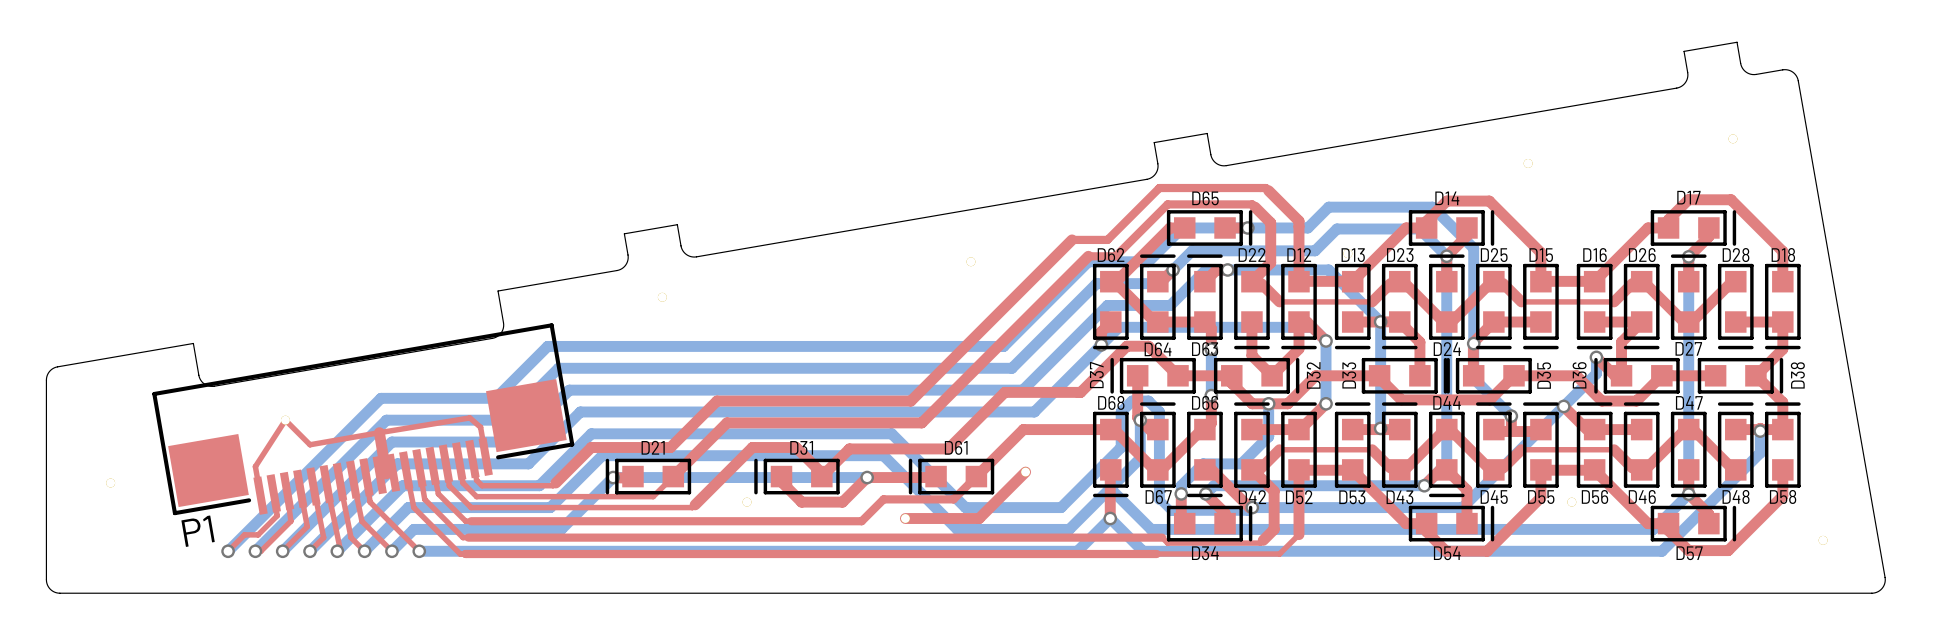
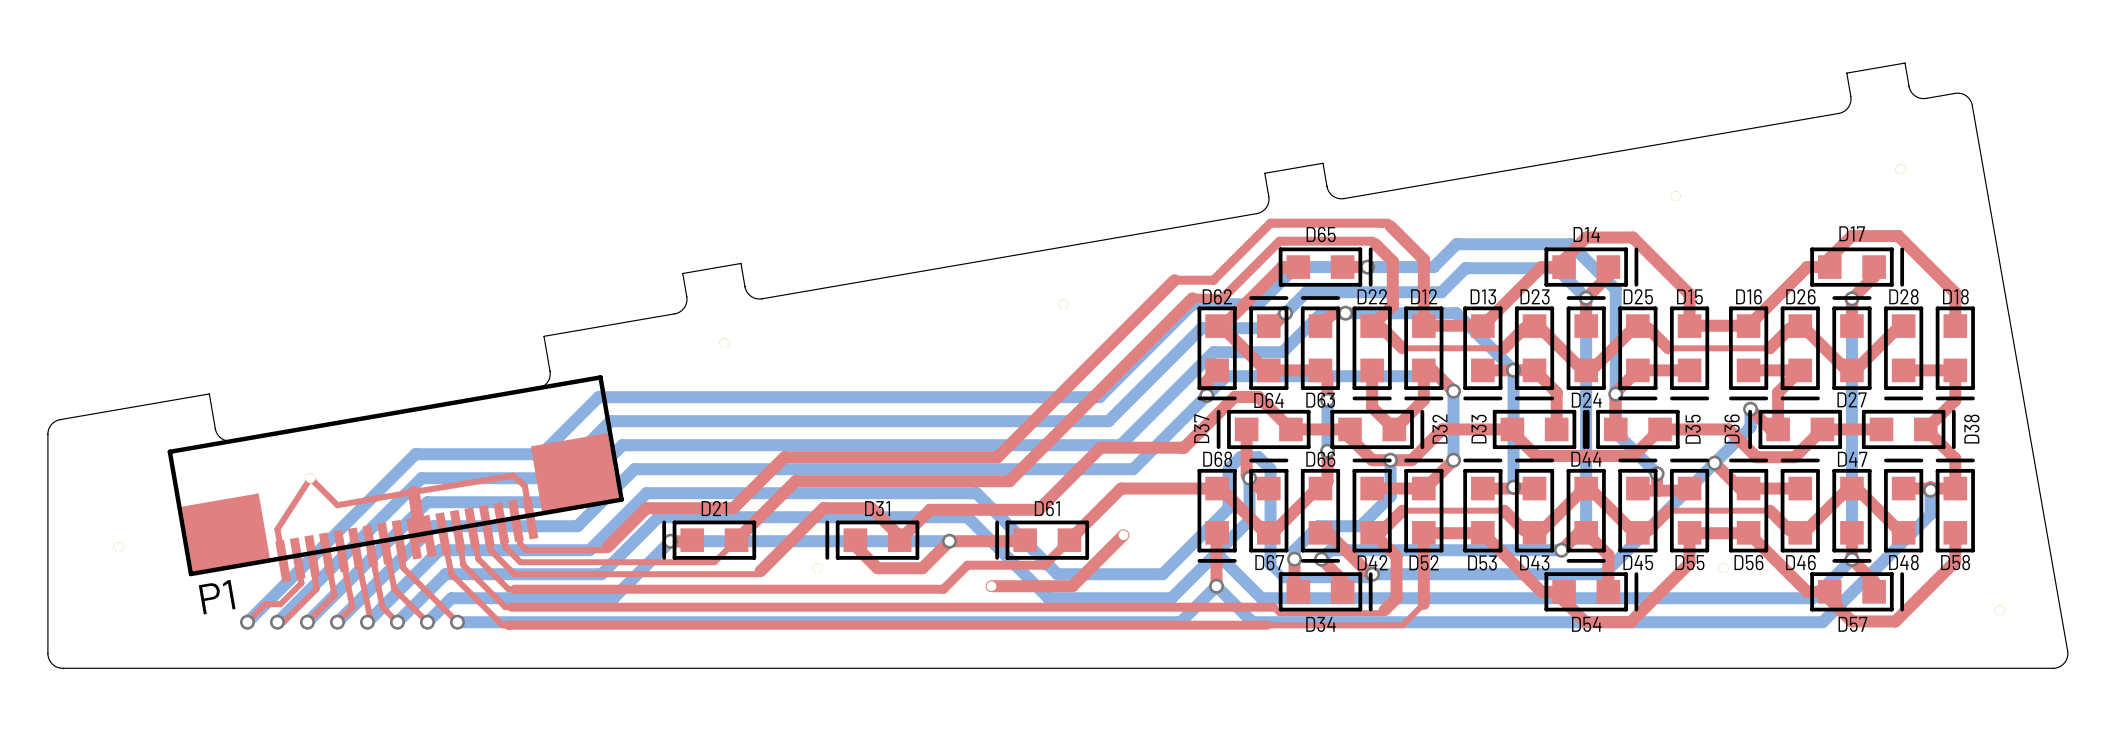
P1 footprint: [152, 323, 575, 516] -> [167, 375, 624, 583]

